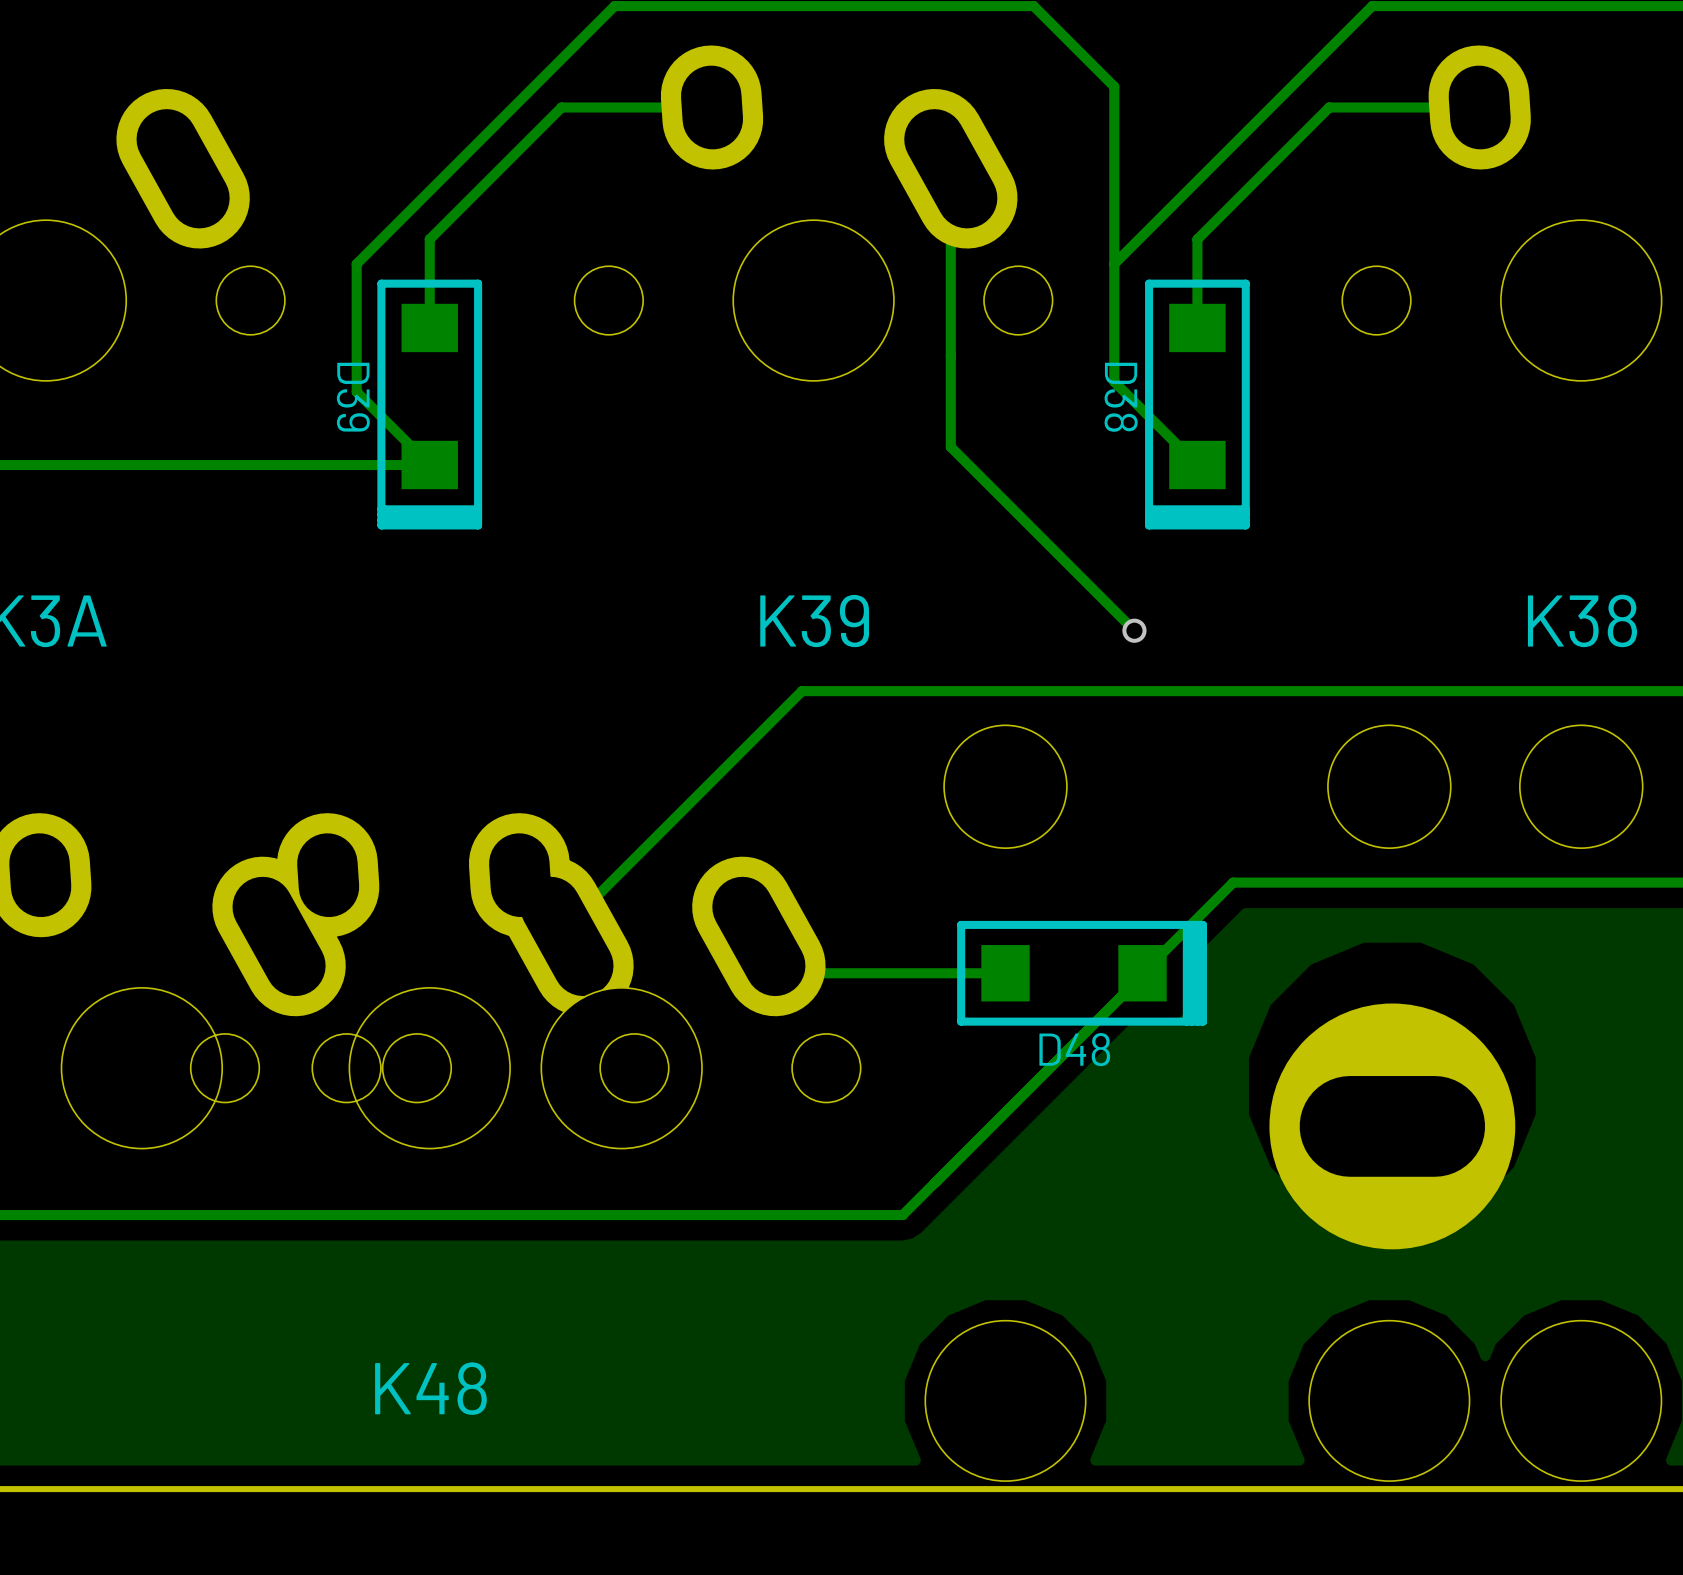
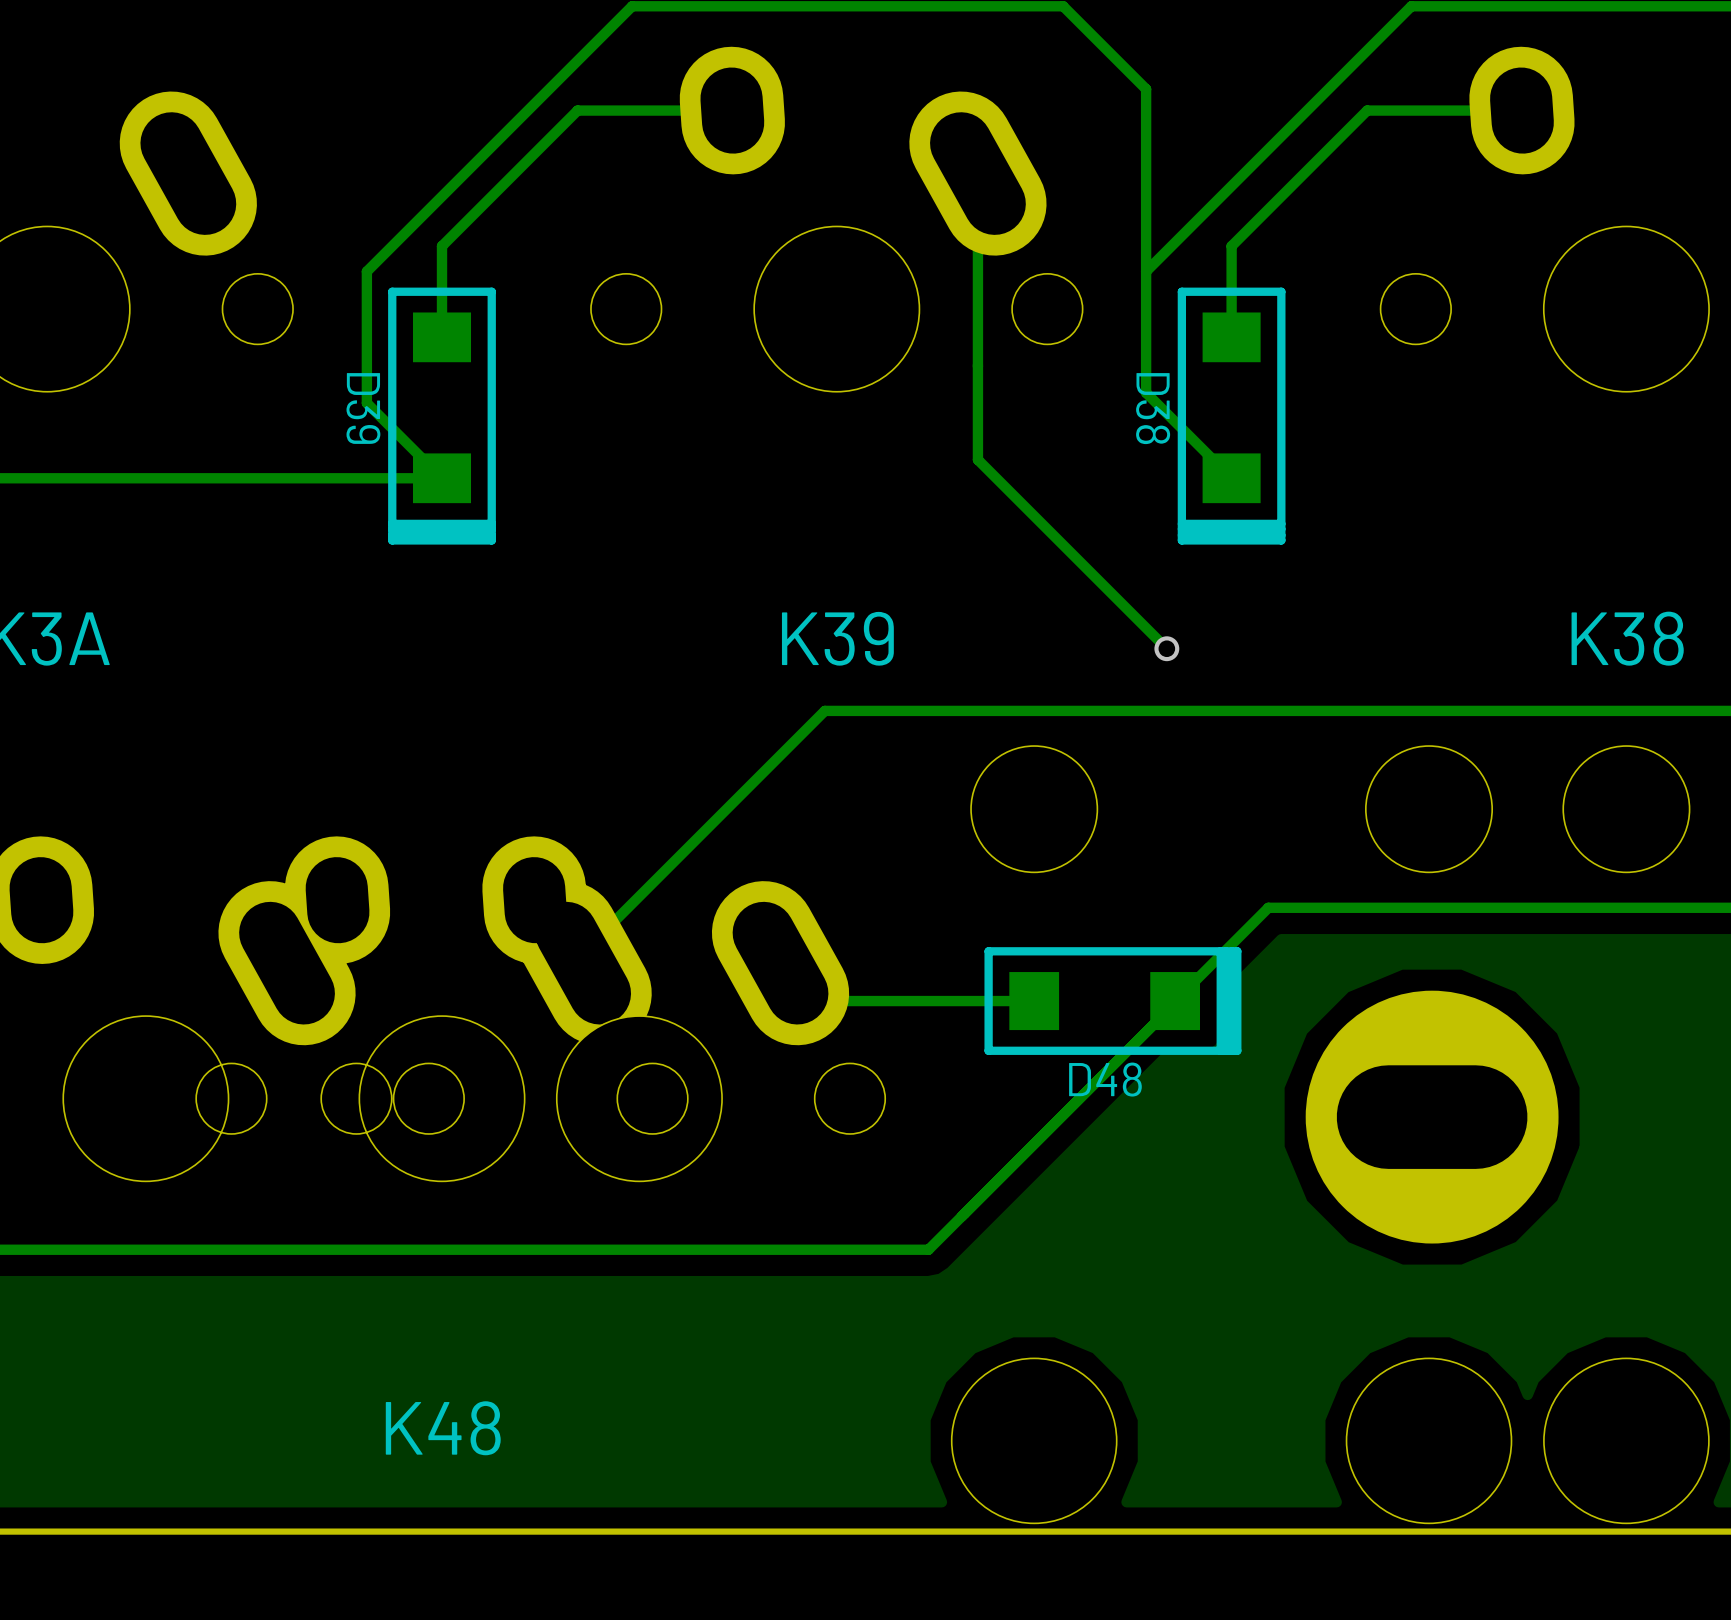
part position: (1392, 1126) -> (1432, 1117)

